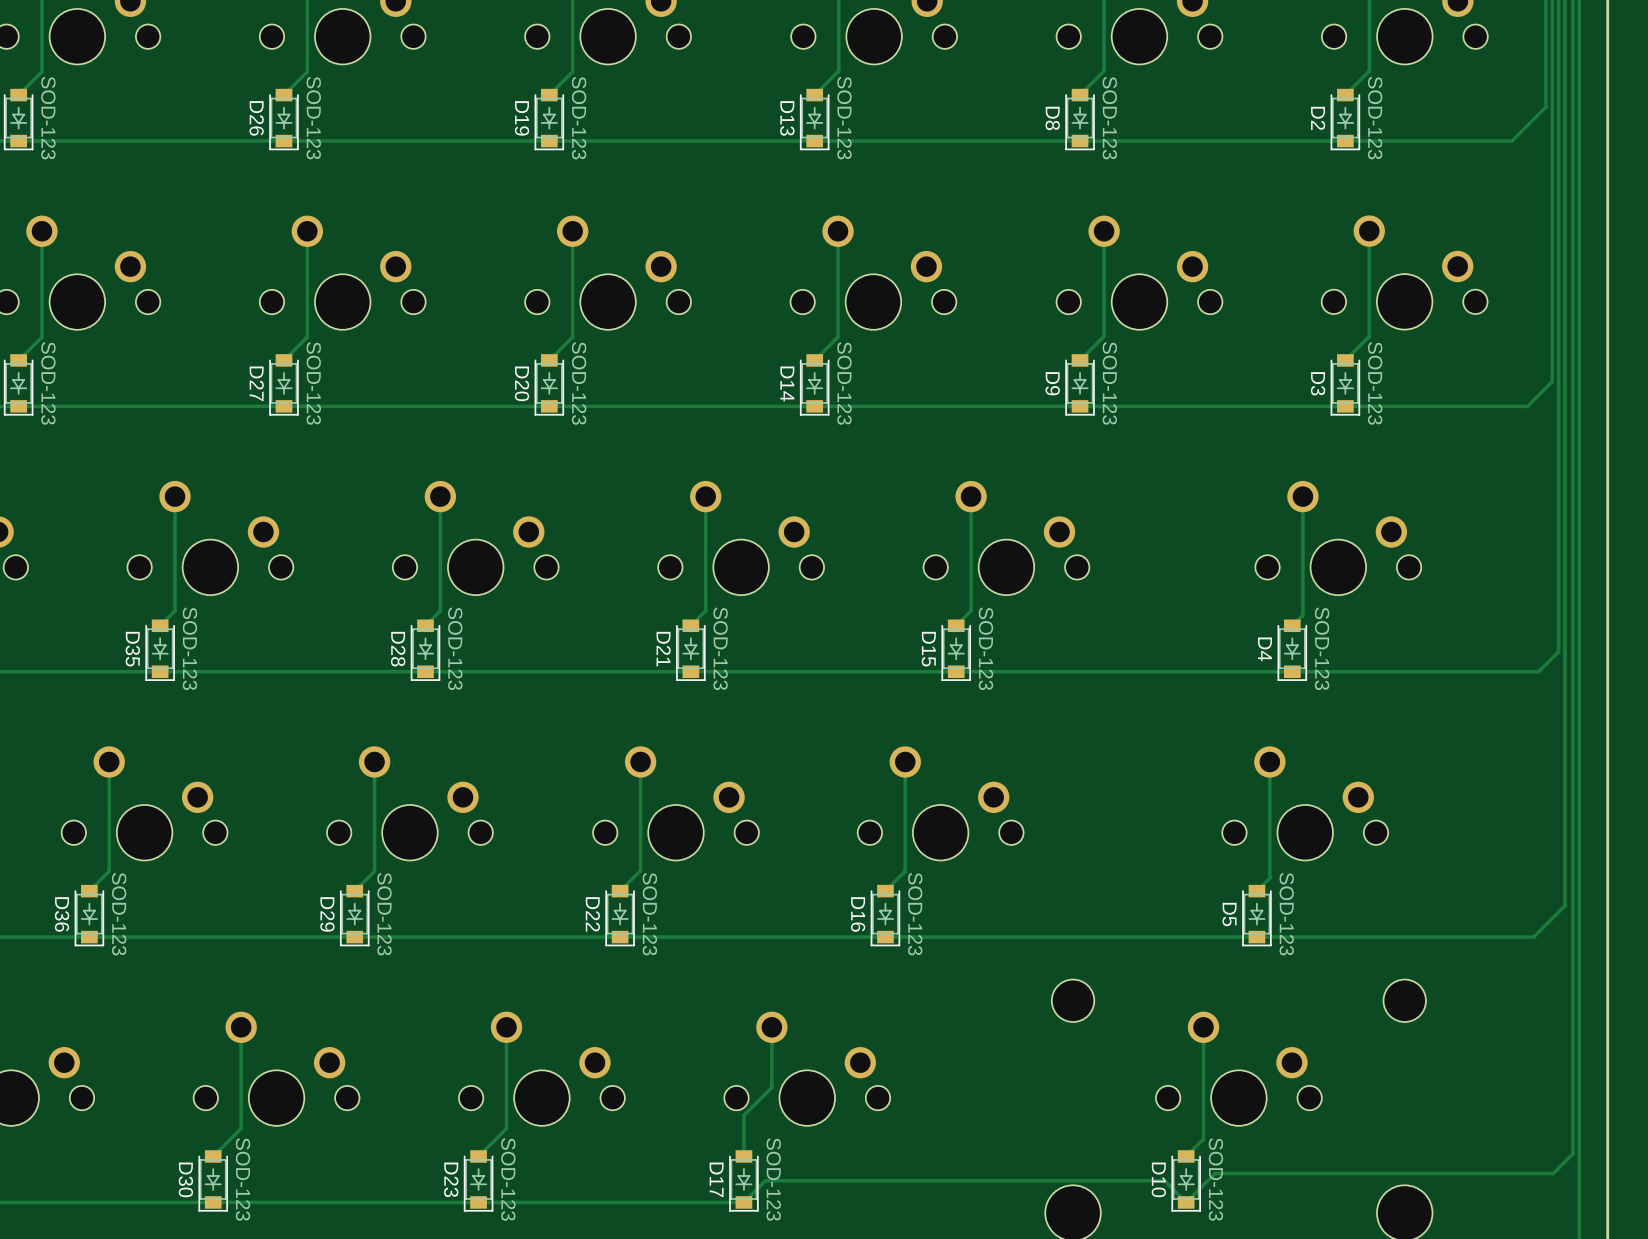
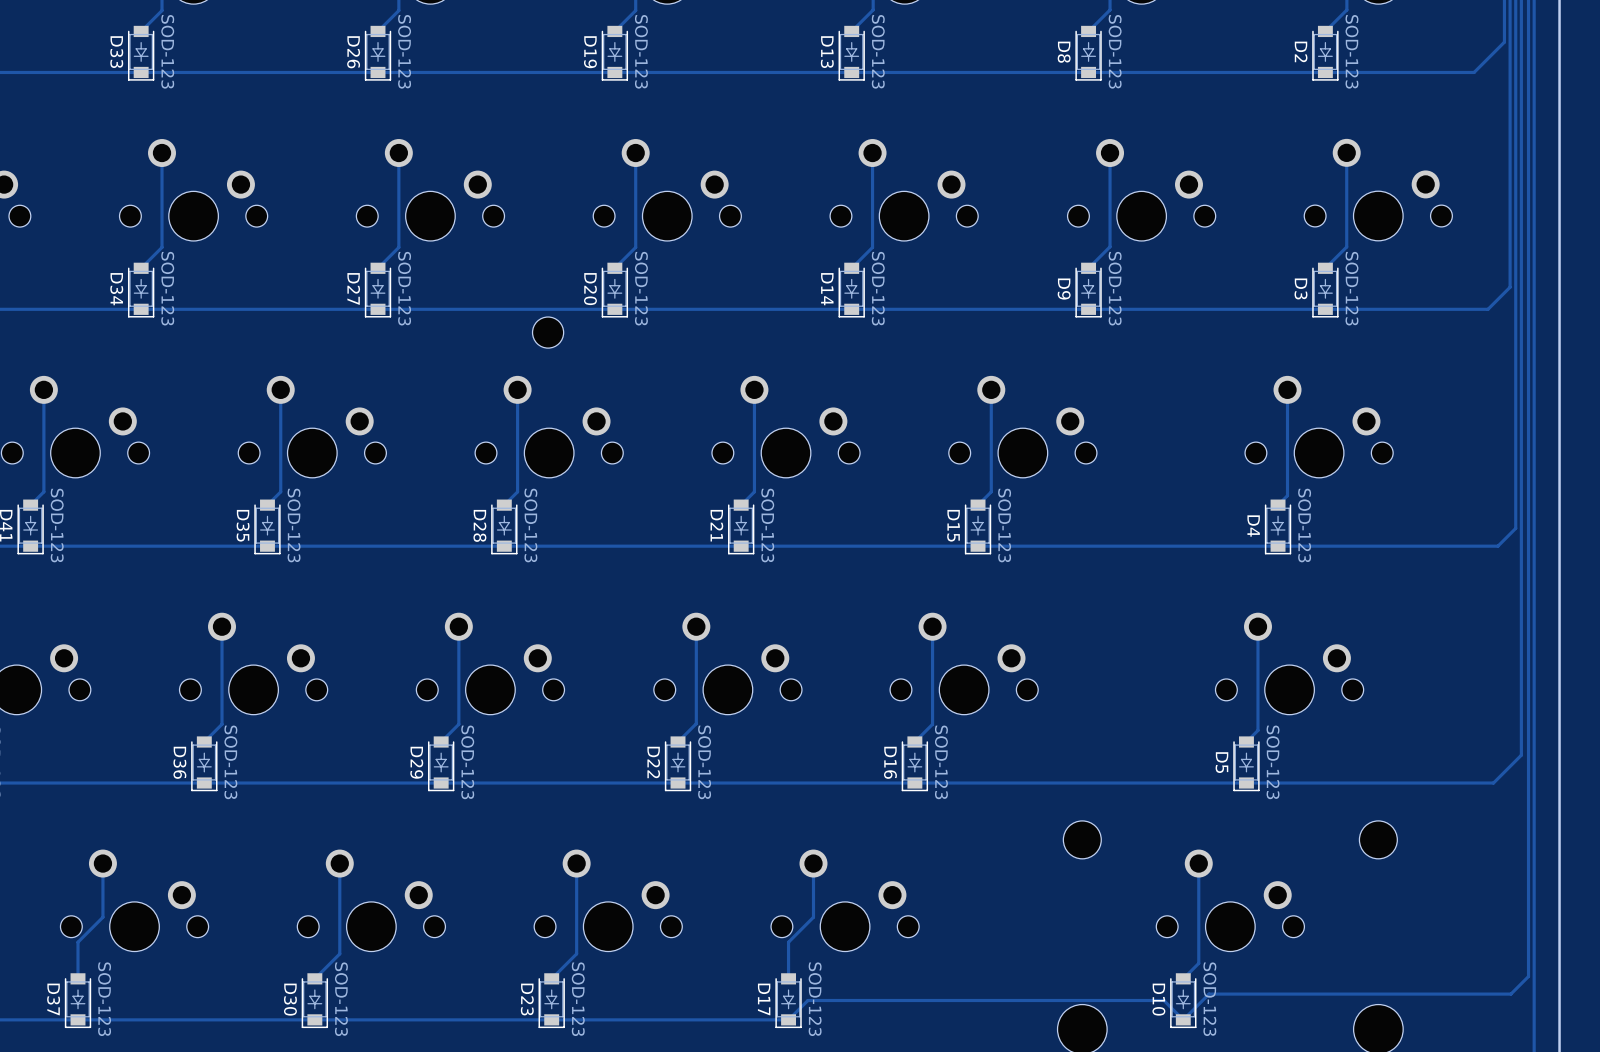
part: none -> (548, 332)

